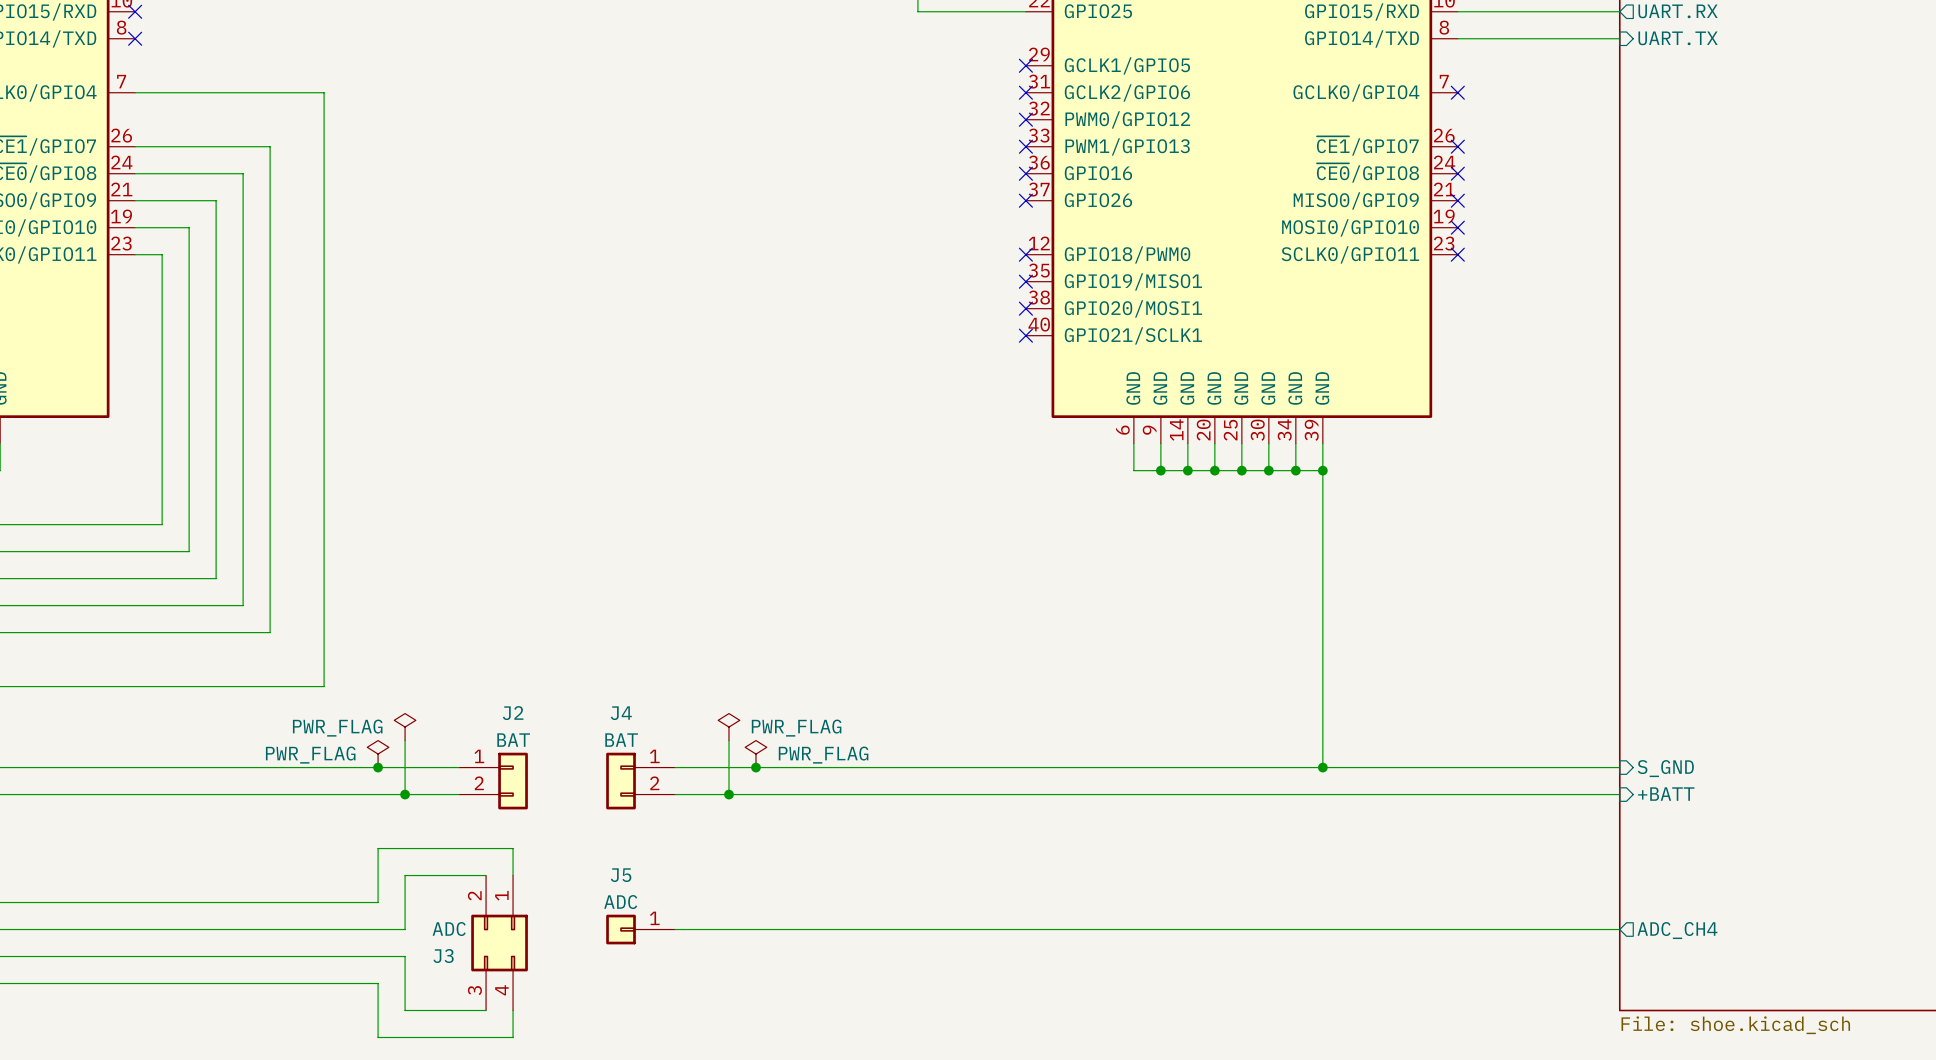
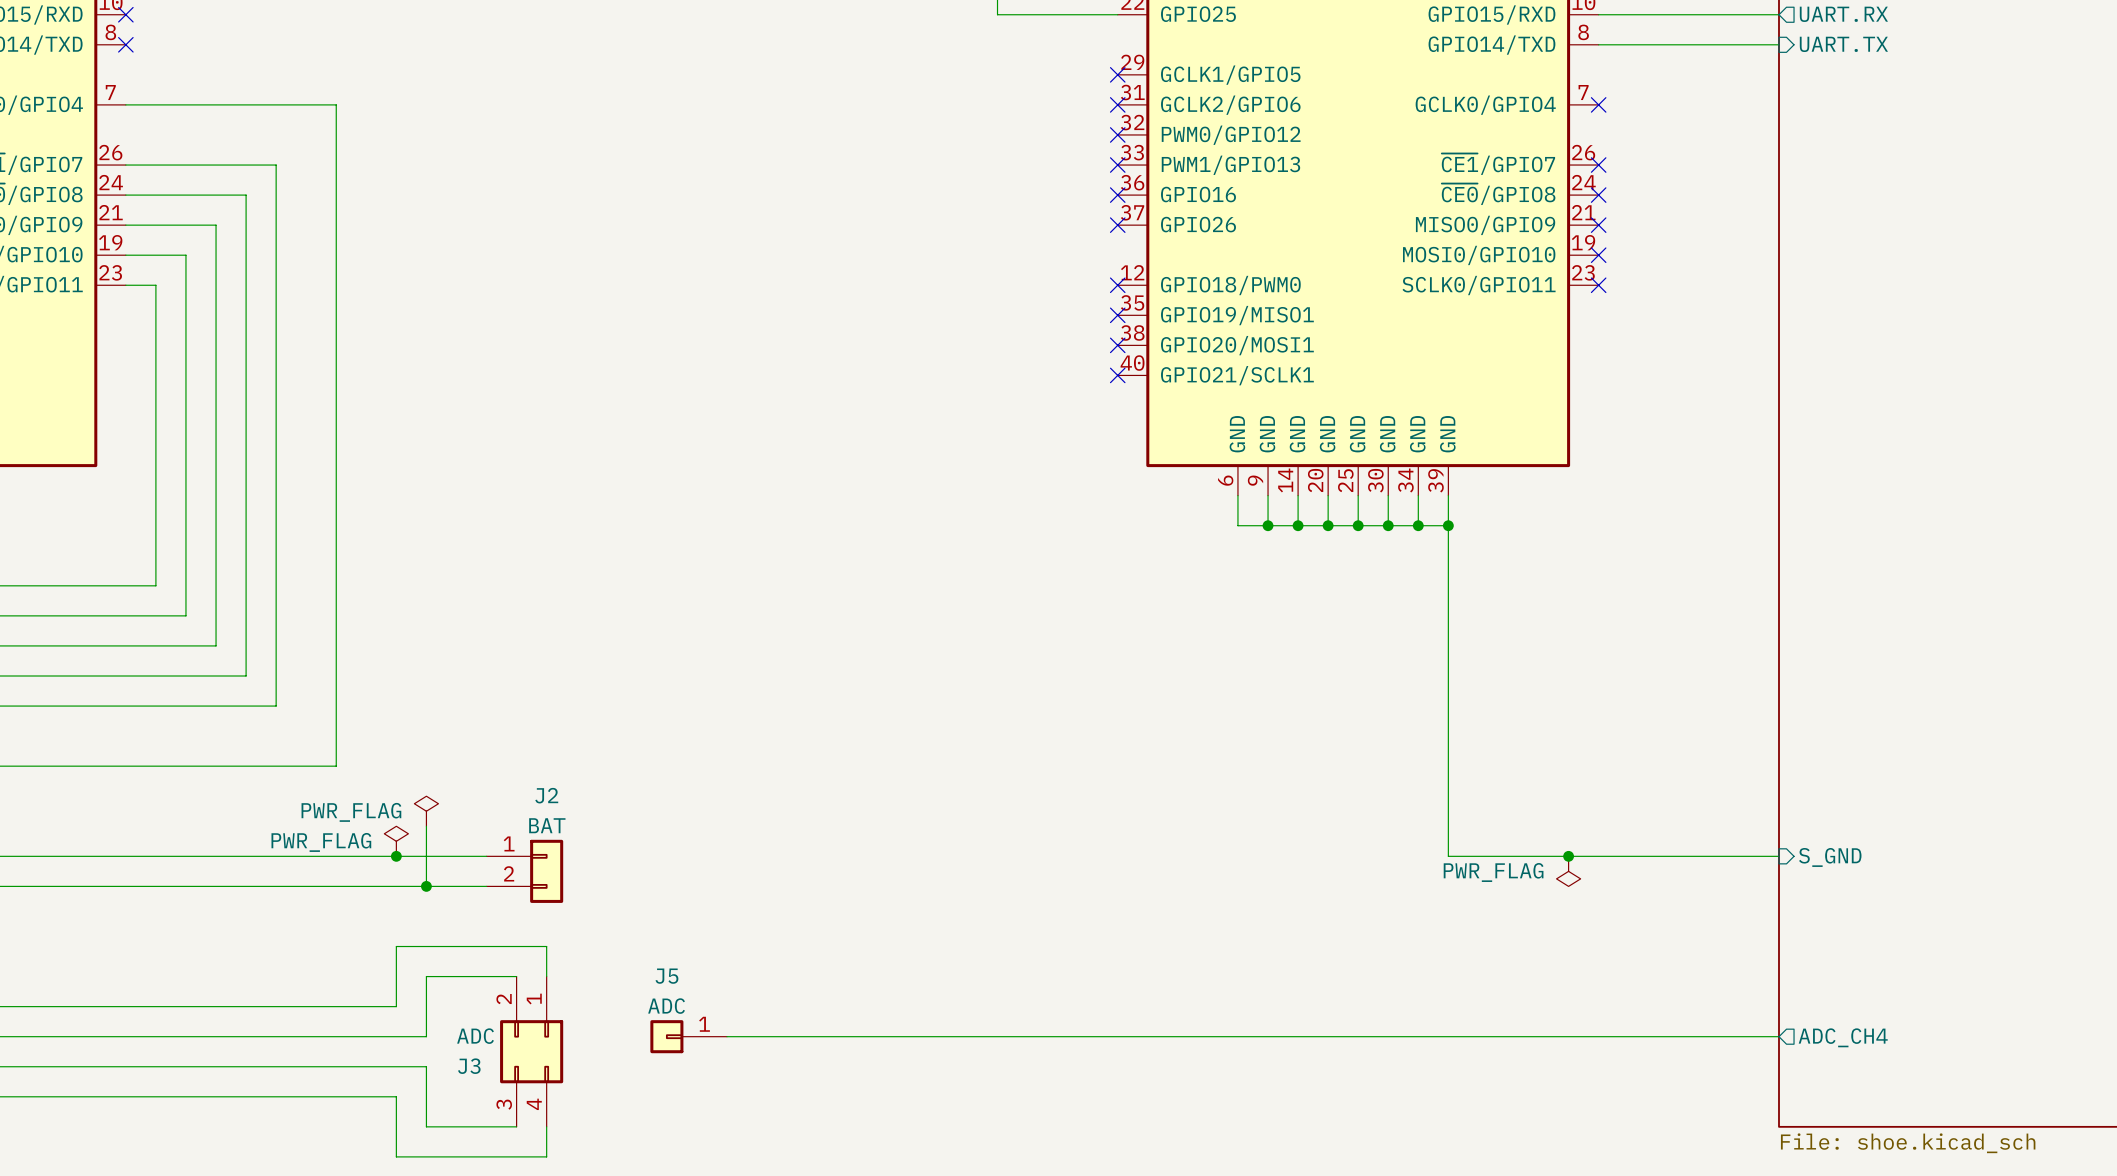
power symbol: PWR_FLAG (728, 727) -> none
wire: (728, 740) (728, 794) -> none
power symbol: PWR_FLAG (755, 754) -> none
wire: (675, 767) (1322, 767) -> none
junction: (755, 767) -> none
junction: (1322, 767) -> none
junction: none -> (1568, 856)
J4: BAT (640, 781) -> none
power symbol: none -> PWR_FLAG (1568, 871)
wire: (675, 794) (1619, 794) -> none
junction: (728, 794) -> none
sheet pin: +BATT (1666, 794) -> none

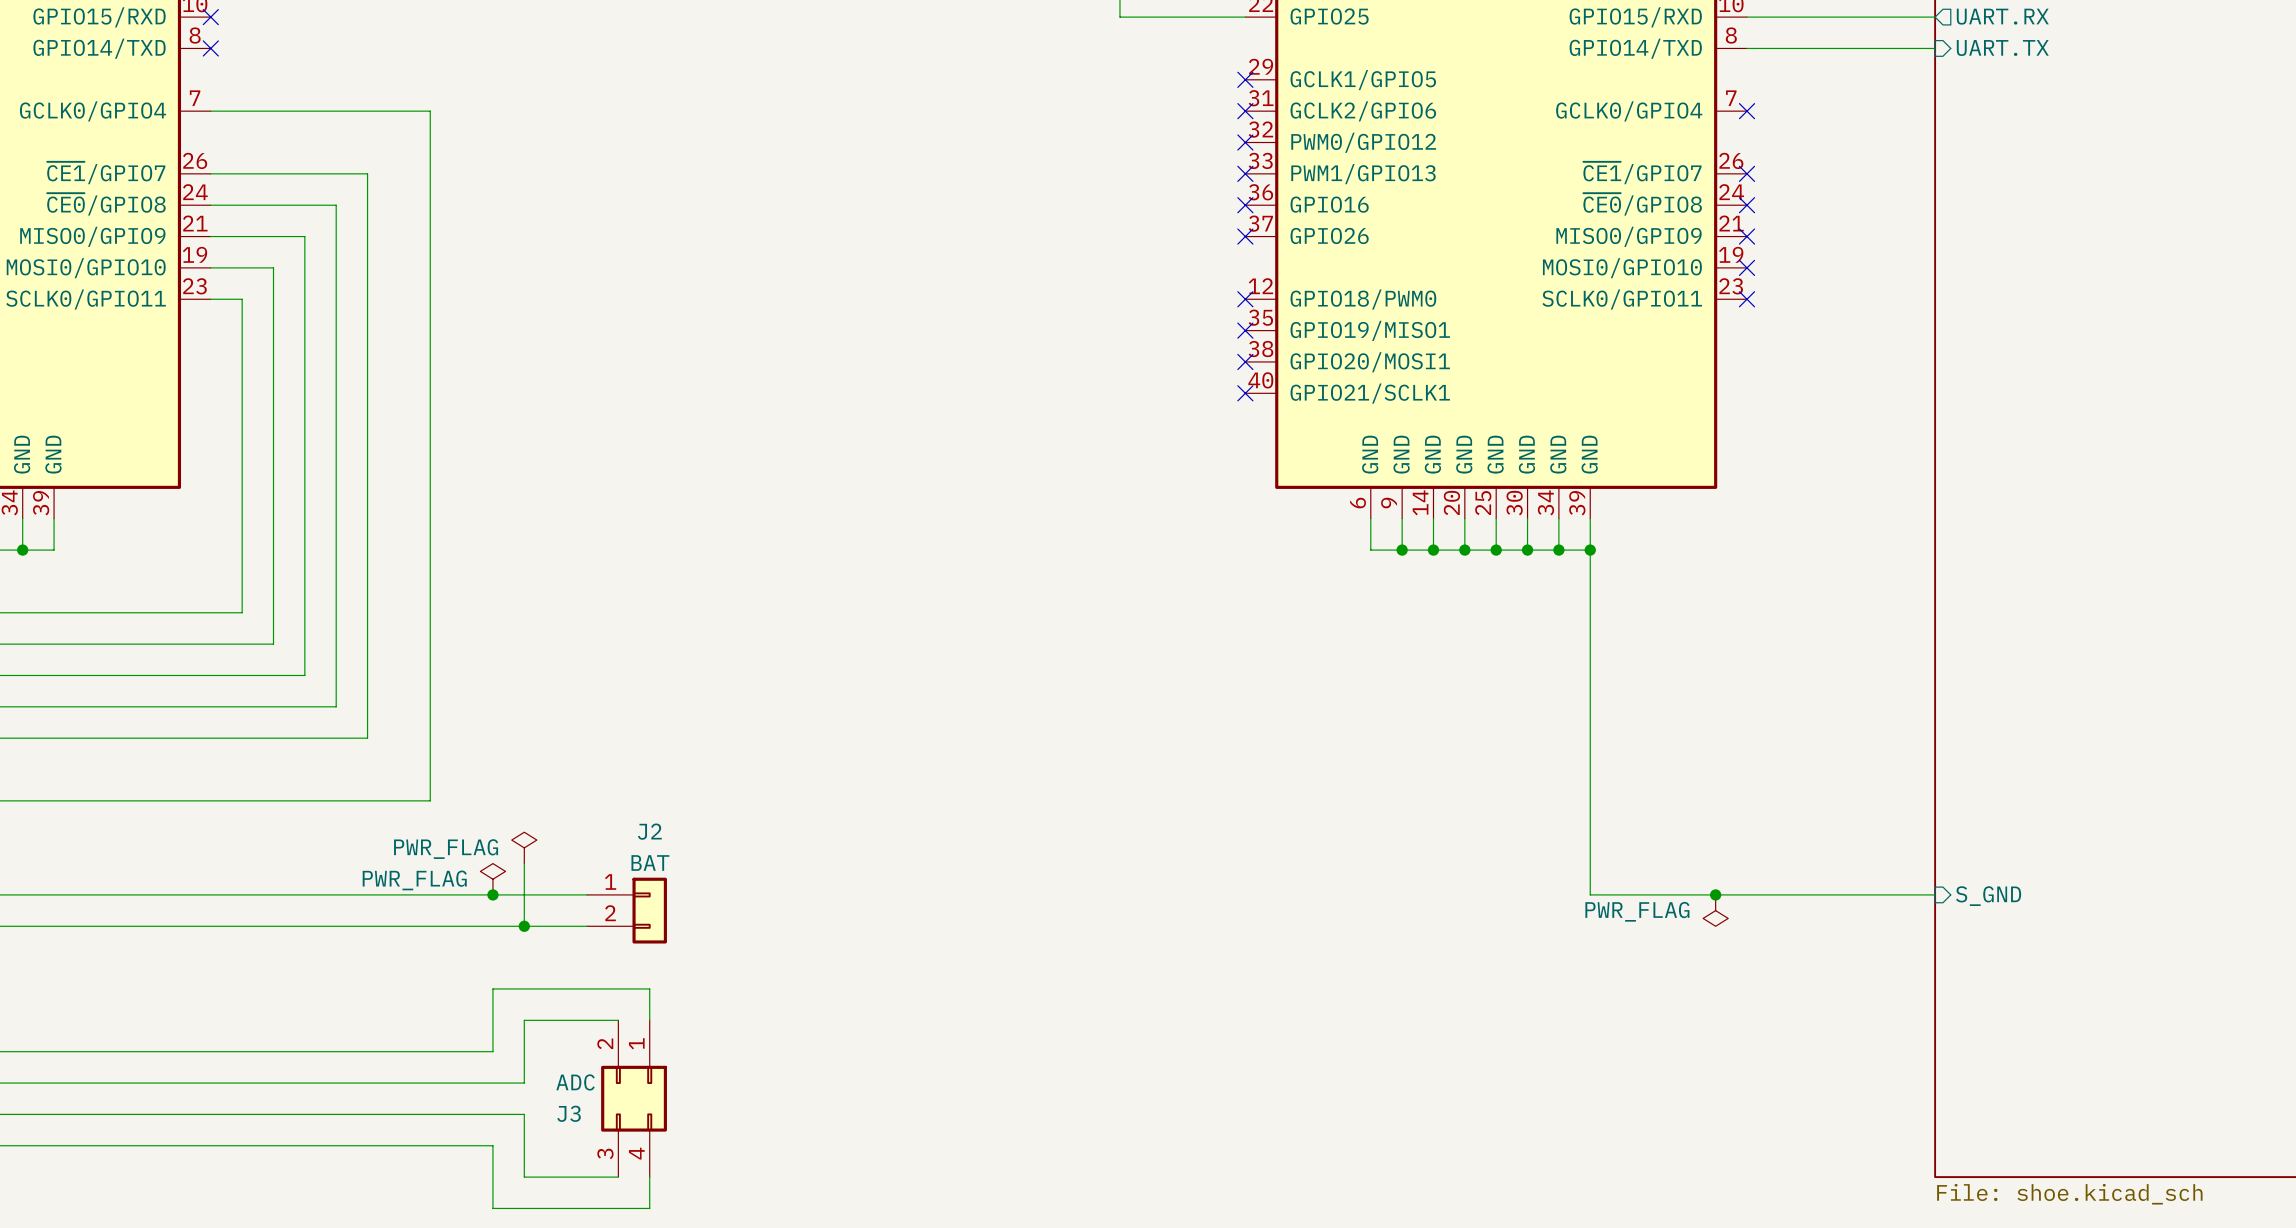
J5: ADC (688, 1036) -> none
wire: (727, 1036) (1778, 1036) -> none
sheet pin: ADC_CH4 (1843, 1037) -> none

